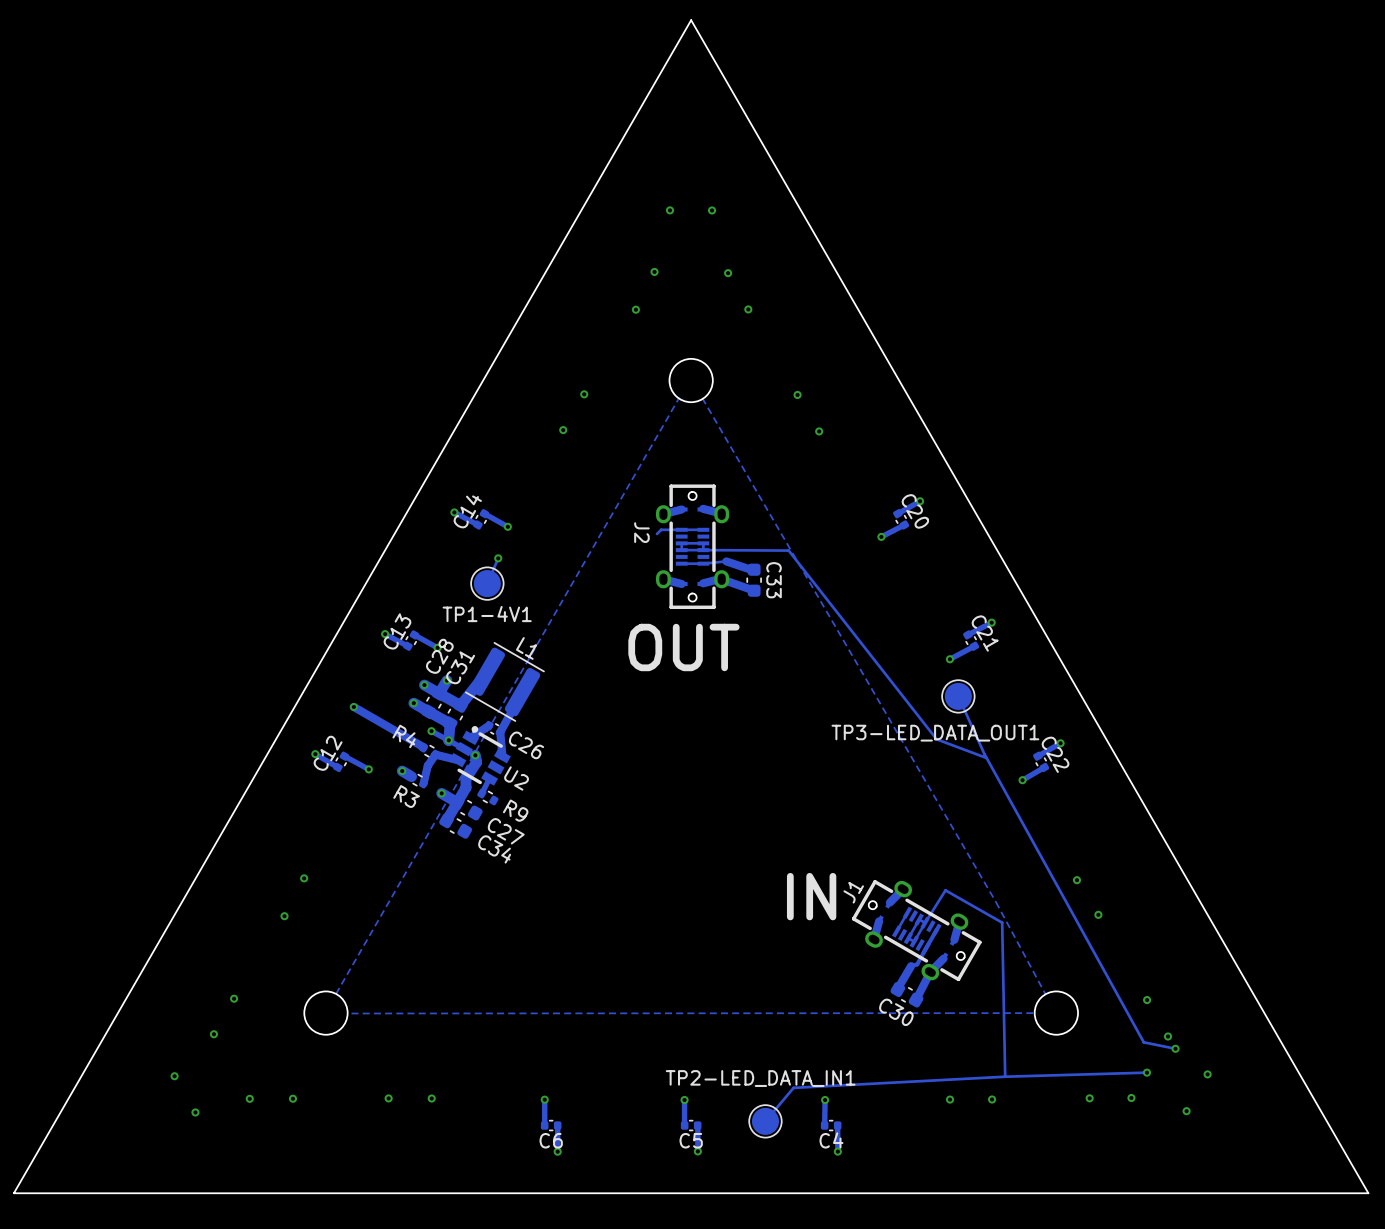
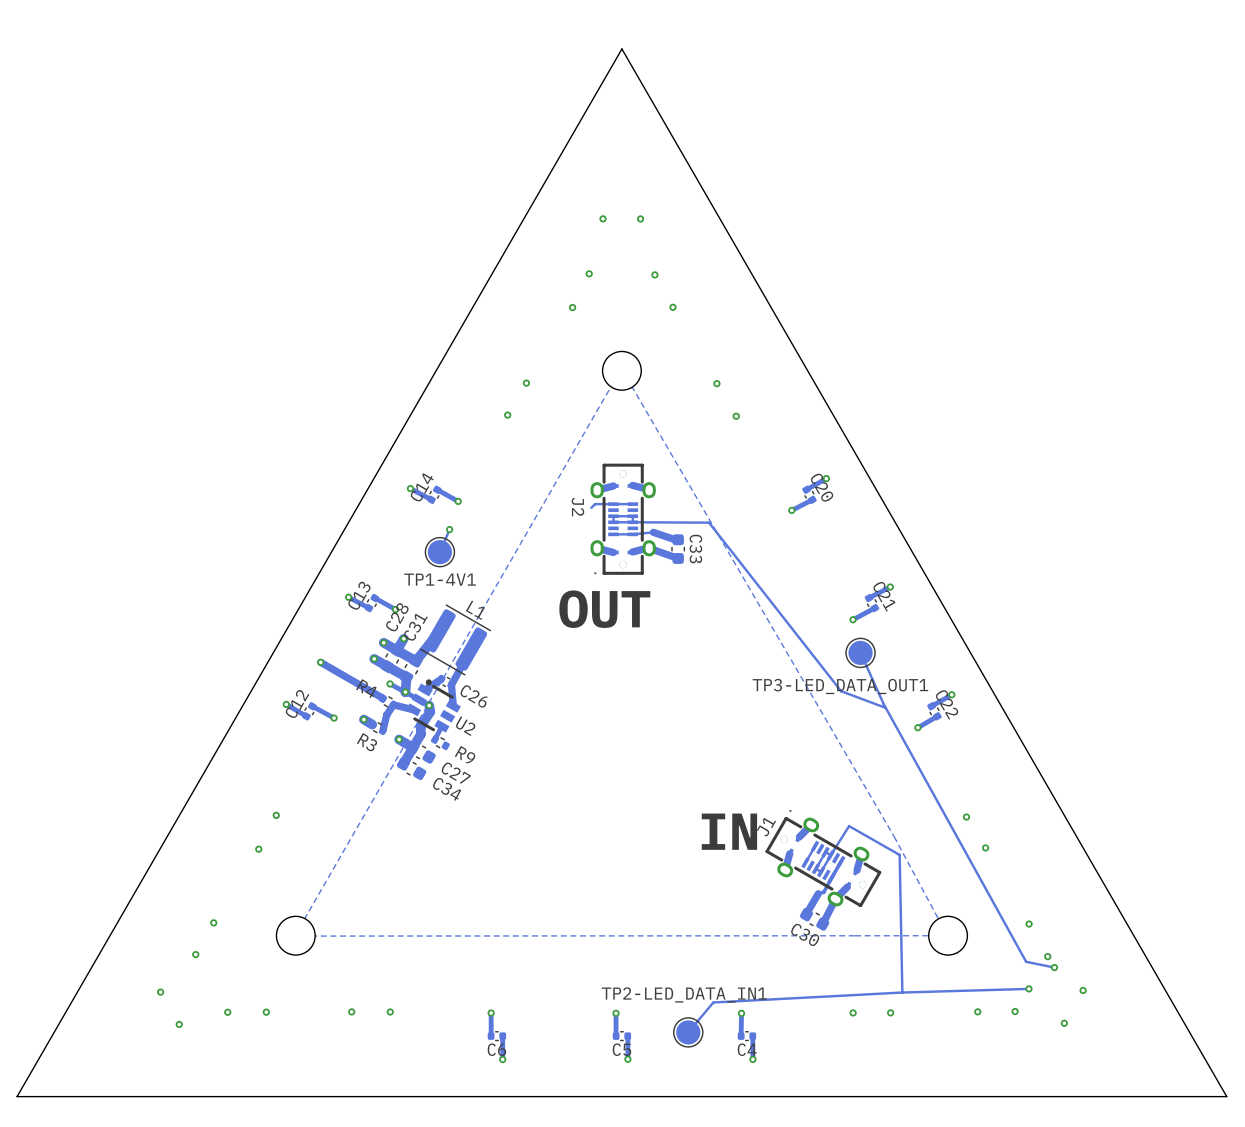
J2 footprint: [655, 484, 730, 610] -> [590, 463, 656, 575]
J1 footprint: [851, 880, 982, 982] -> [765, 810, 882, 908]

